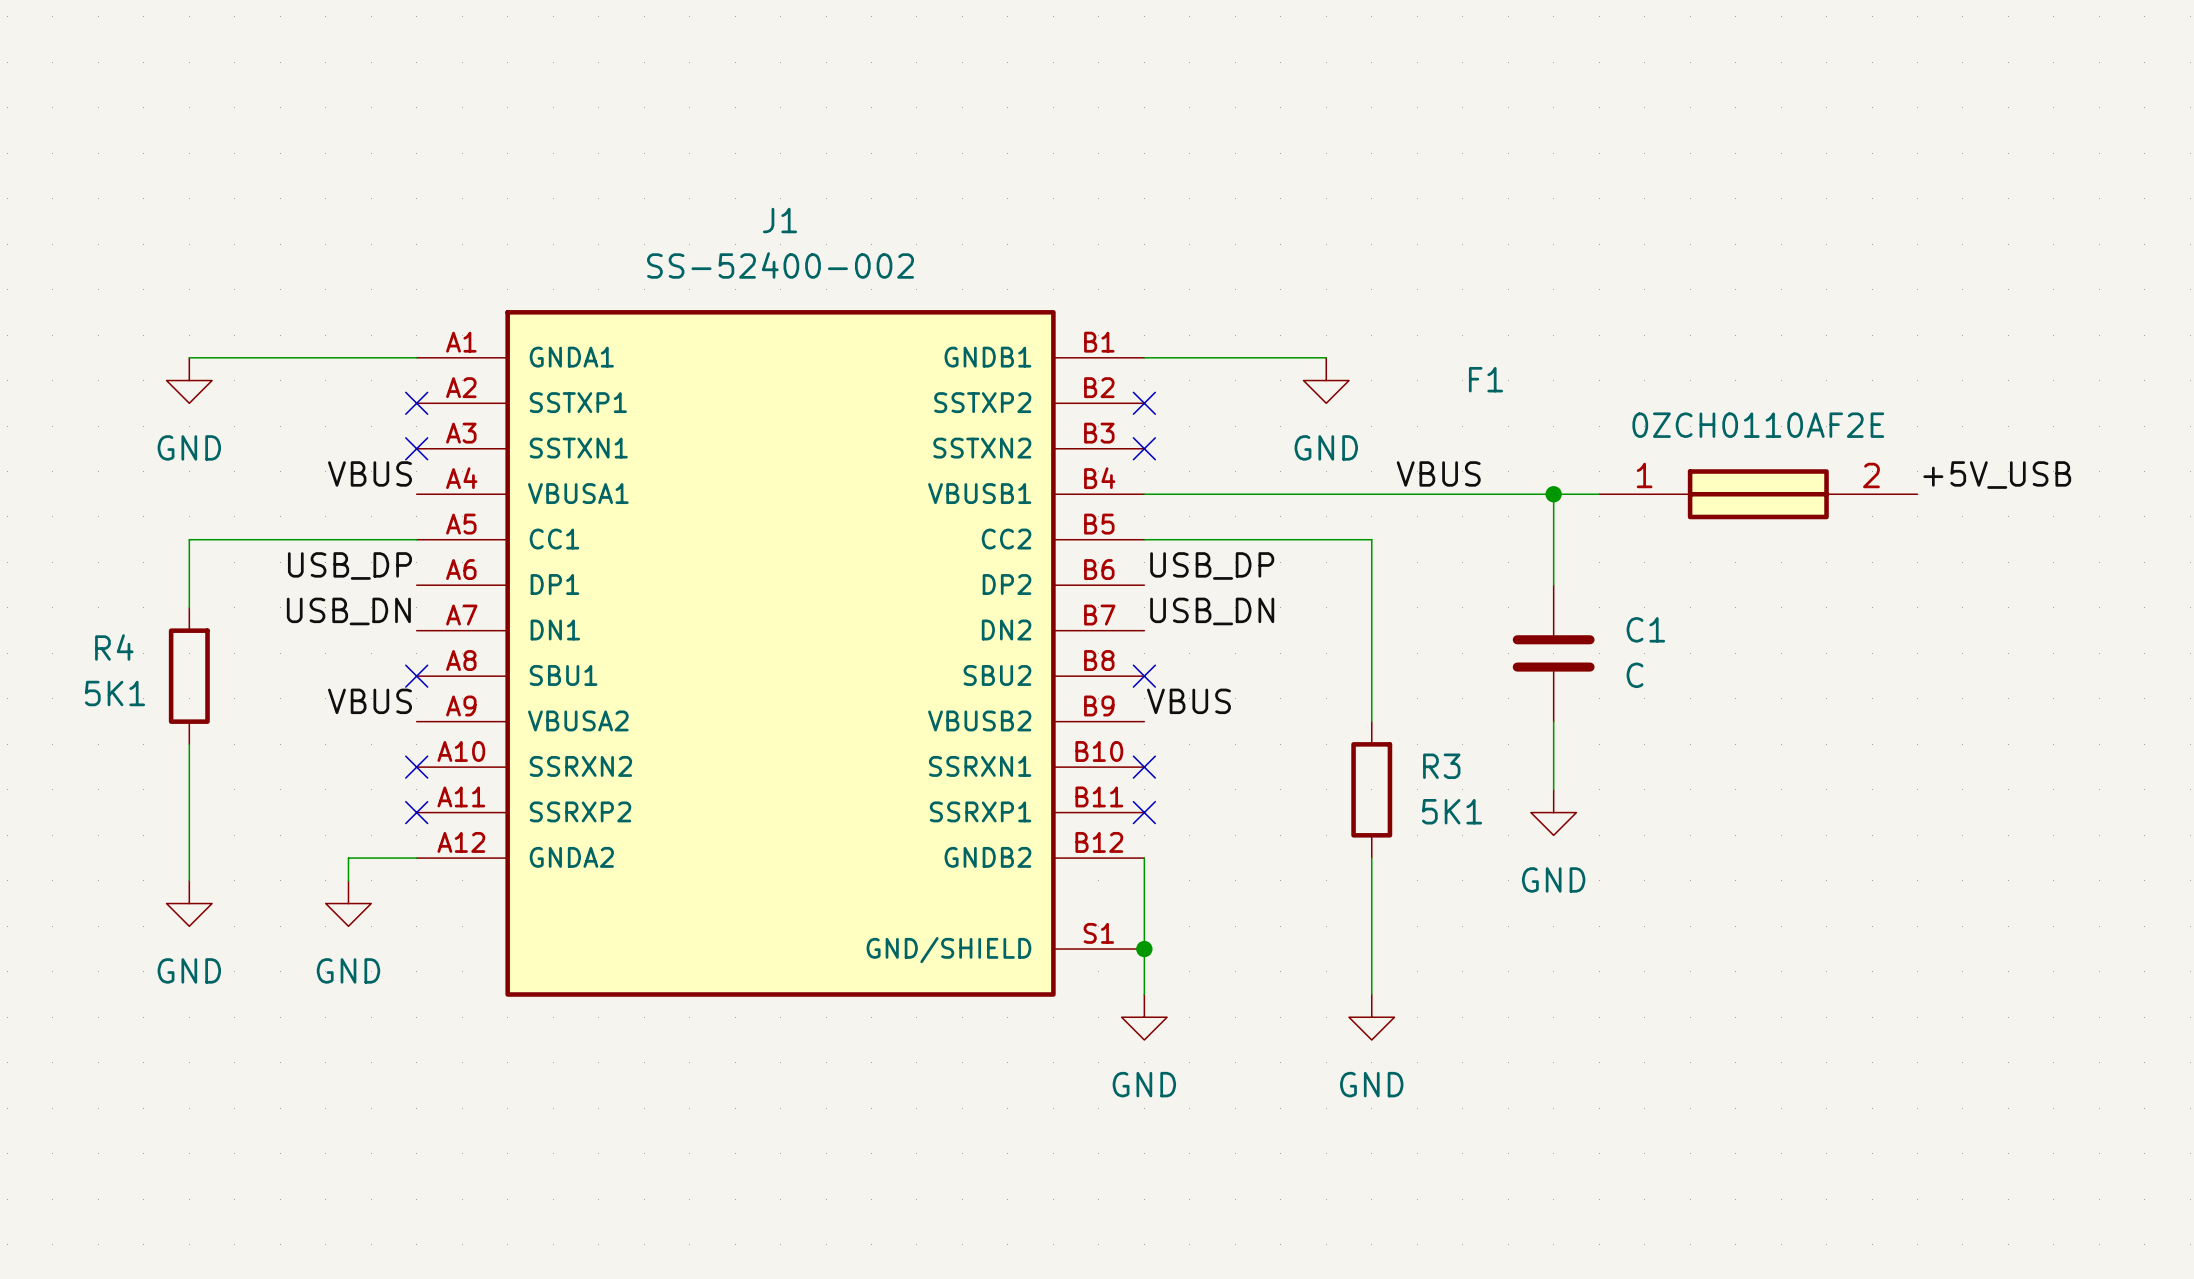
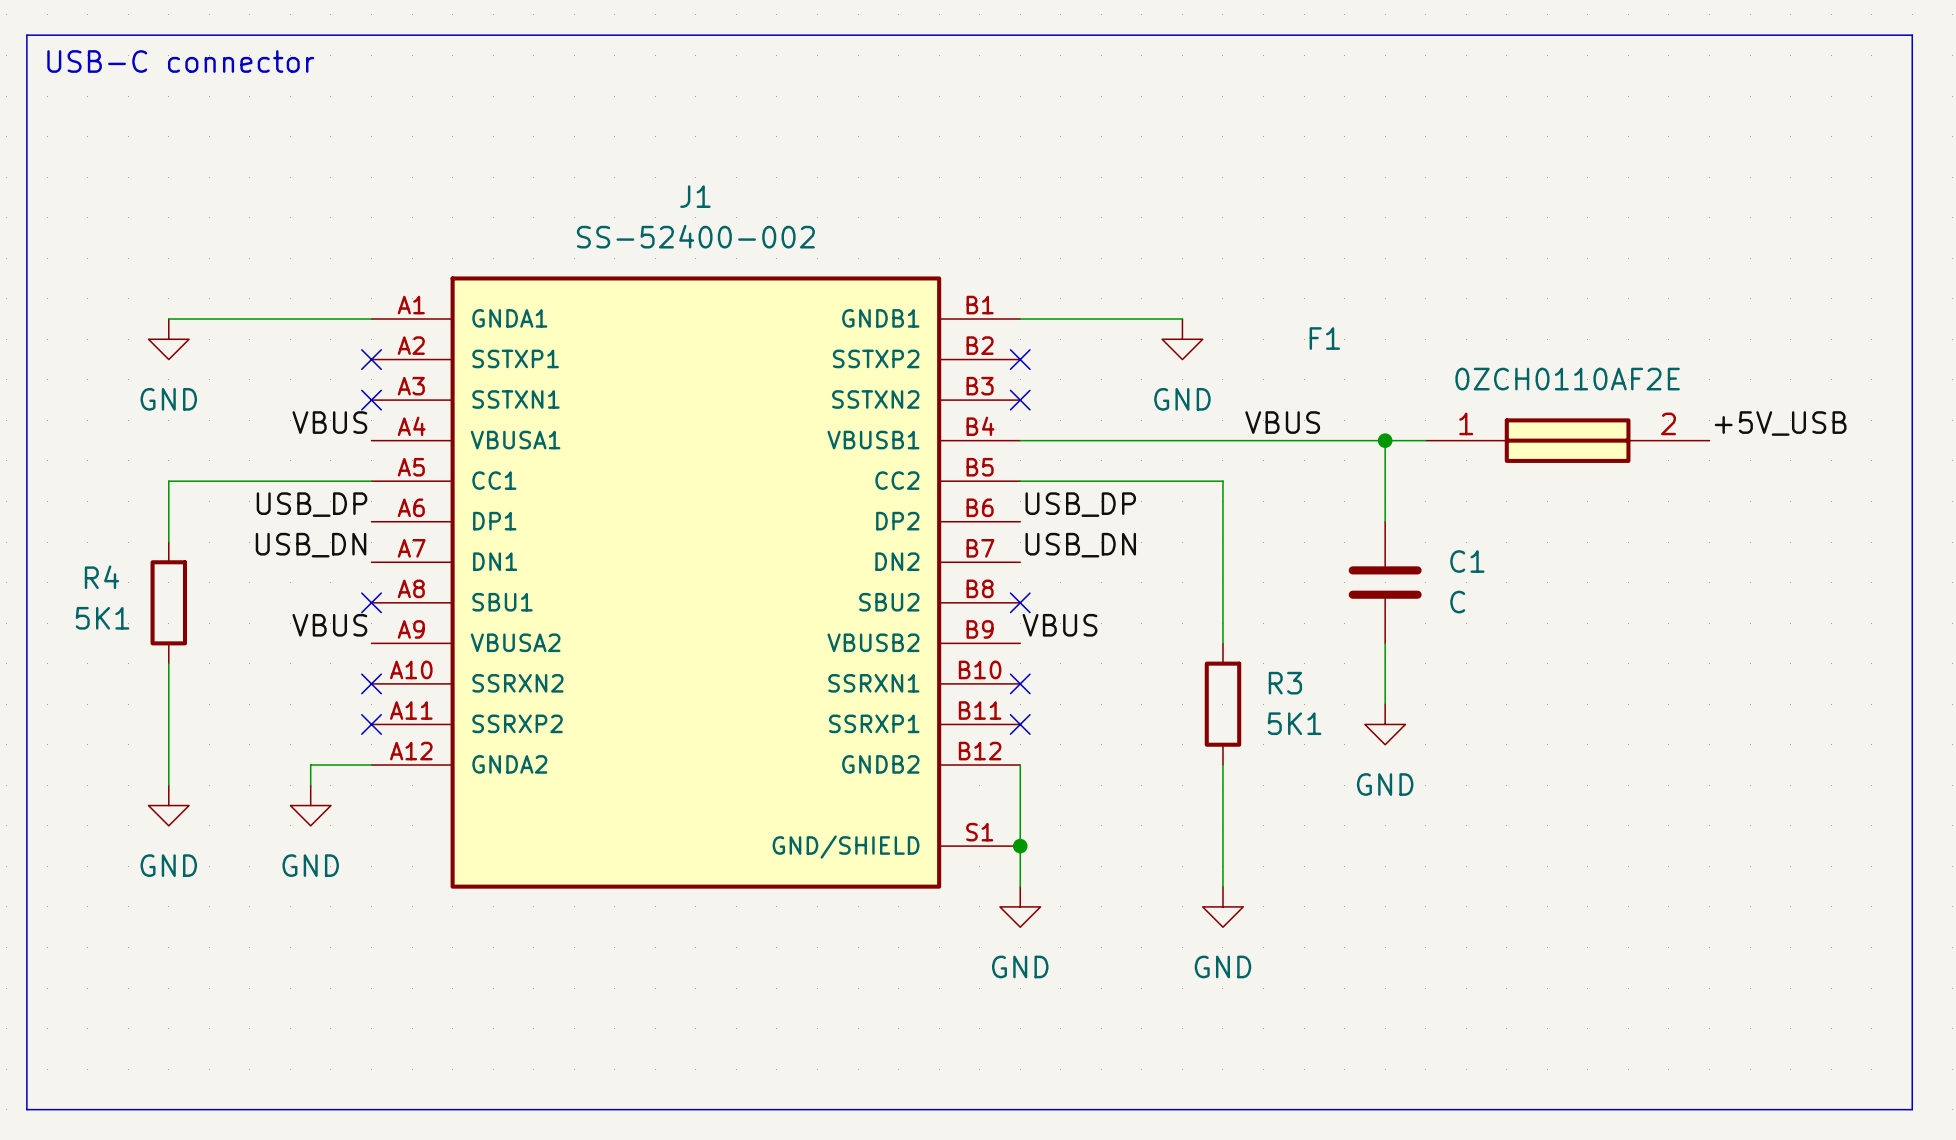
line: none -> (26, 35) (1912, 35) (1912, 1109) (26, 1109) (26, 35)
text: none -> USB-C connector (180, 61)

